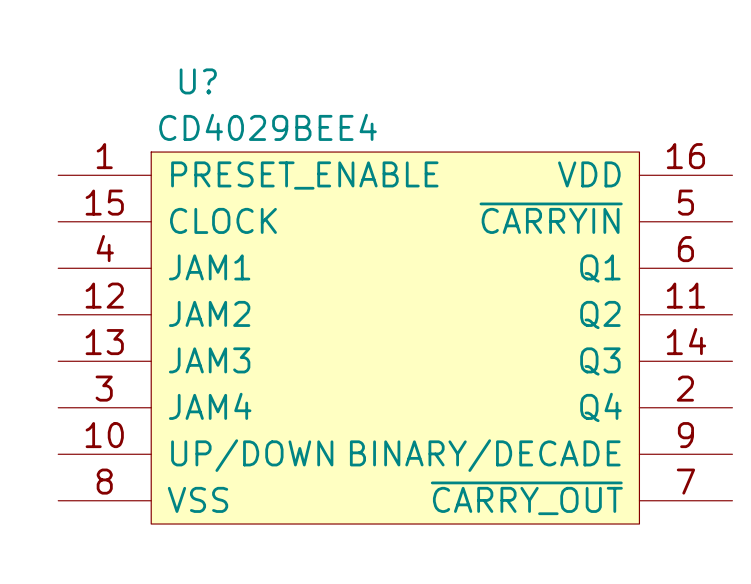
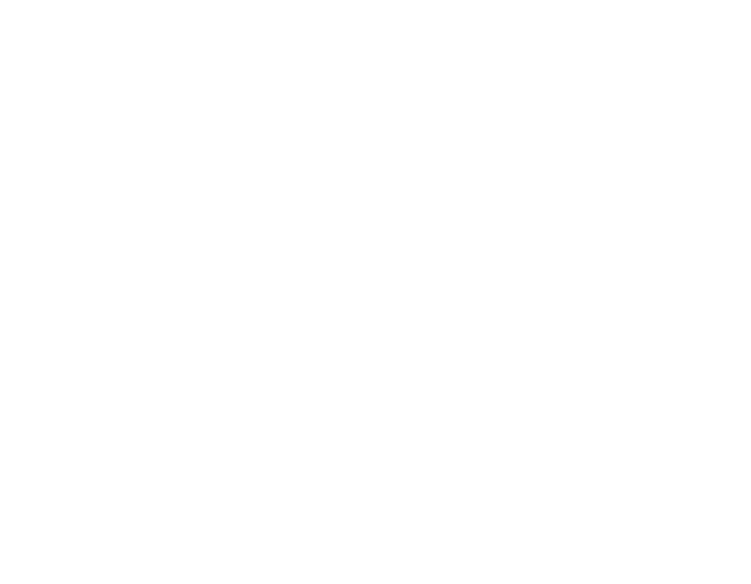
U?: CD4029BEE4 (395, 338) -> none

